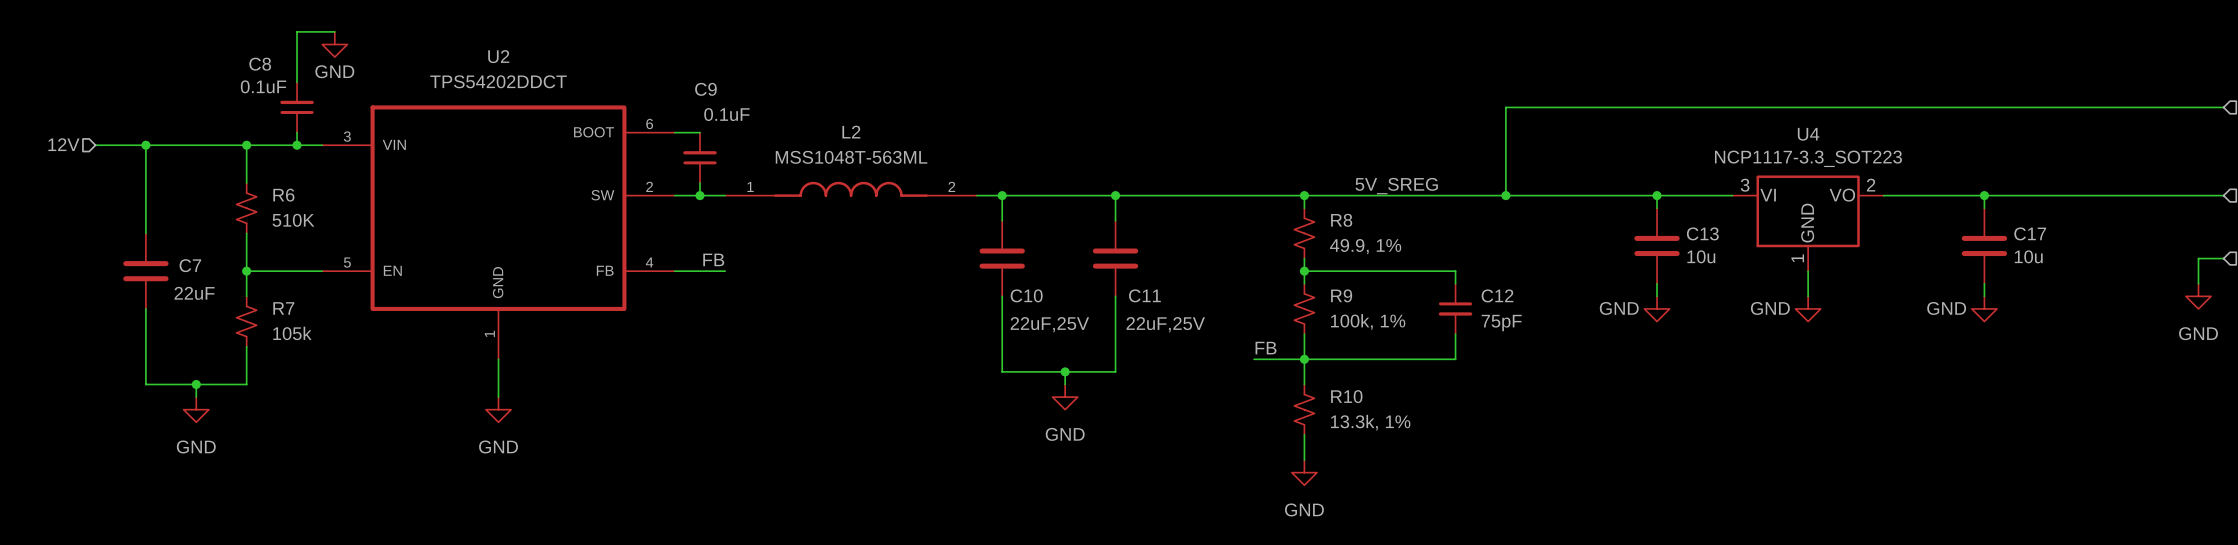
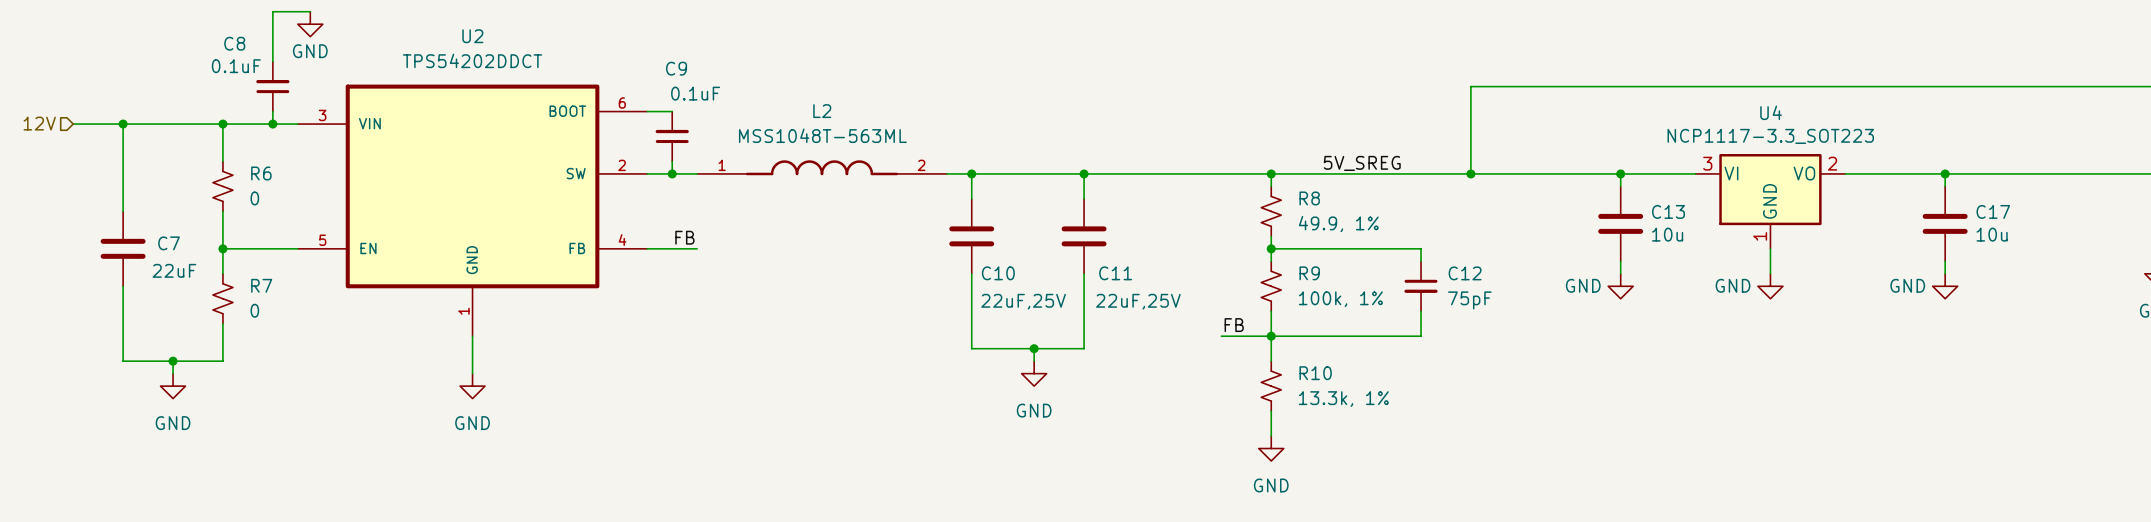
R6 value: 510K (293, 220) -> 0 (254, 198)
R7 value: 105k (292, 333) -> 0 (254, 310)

